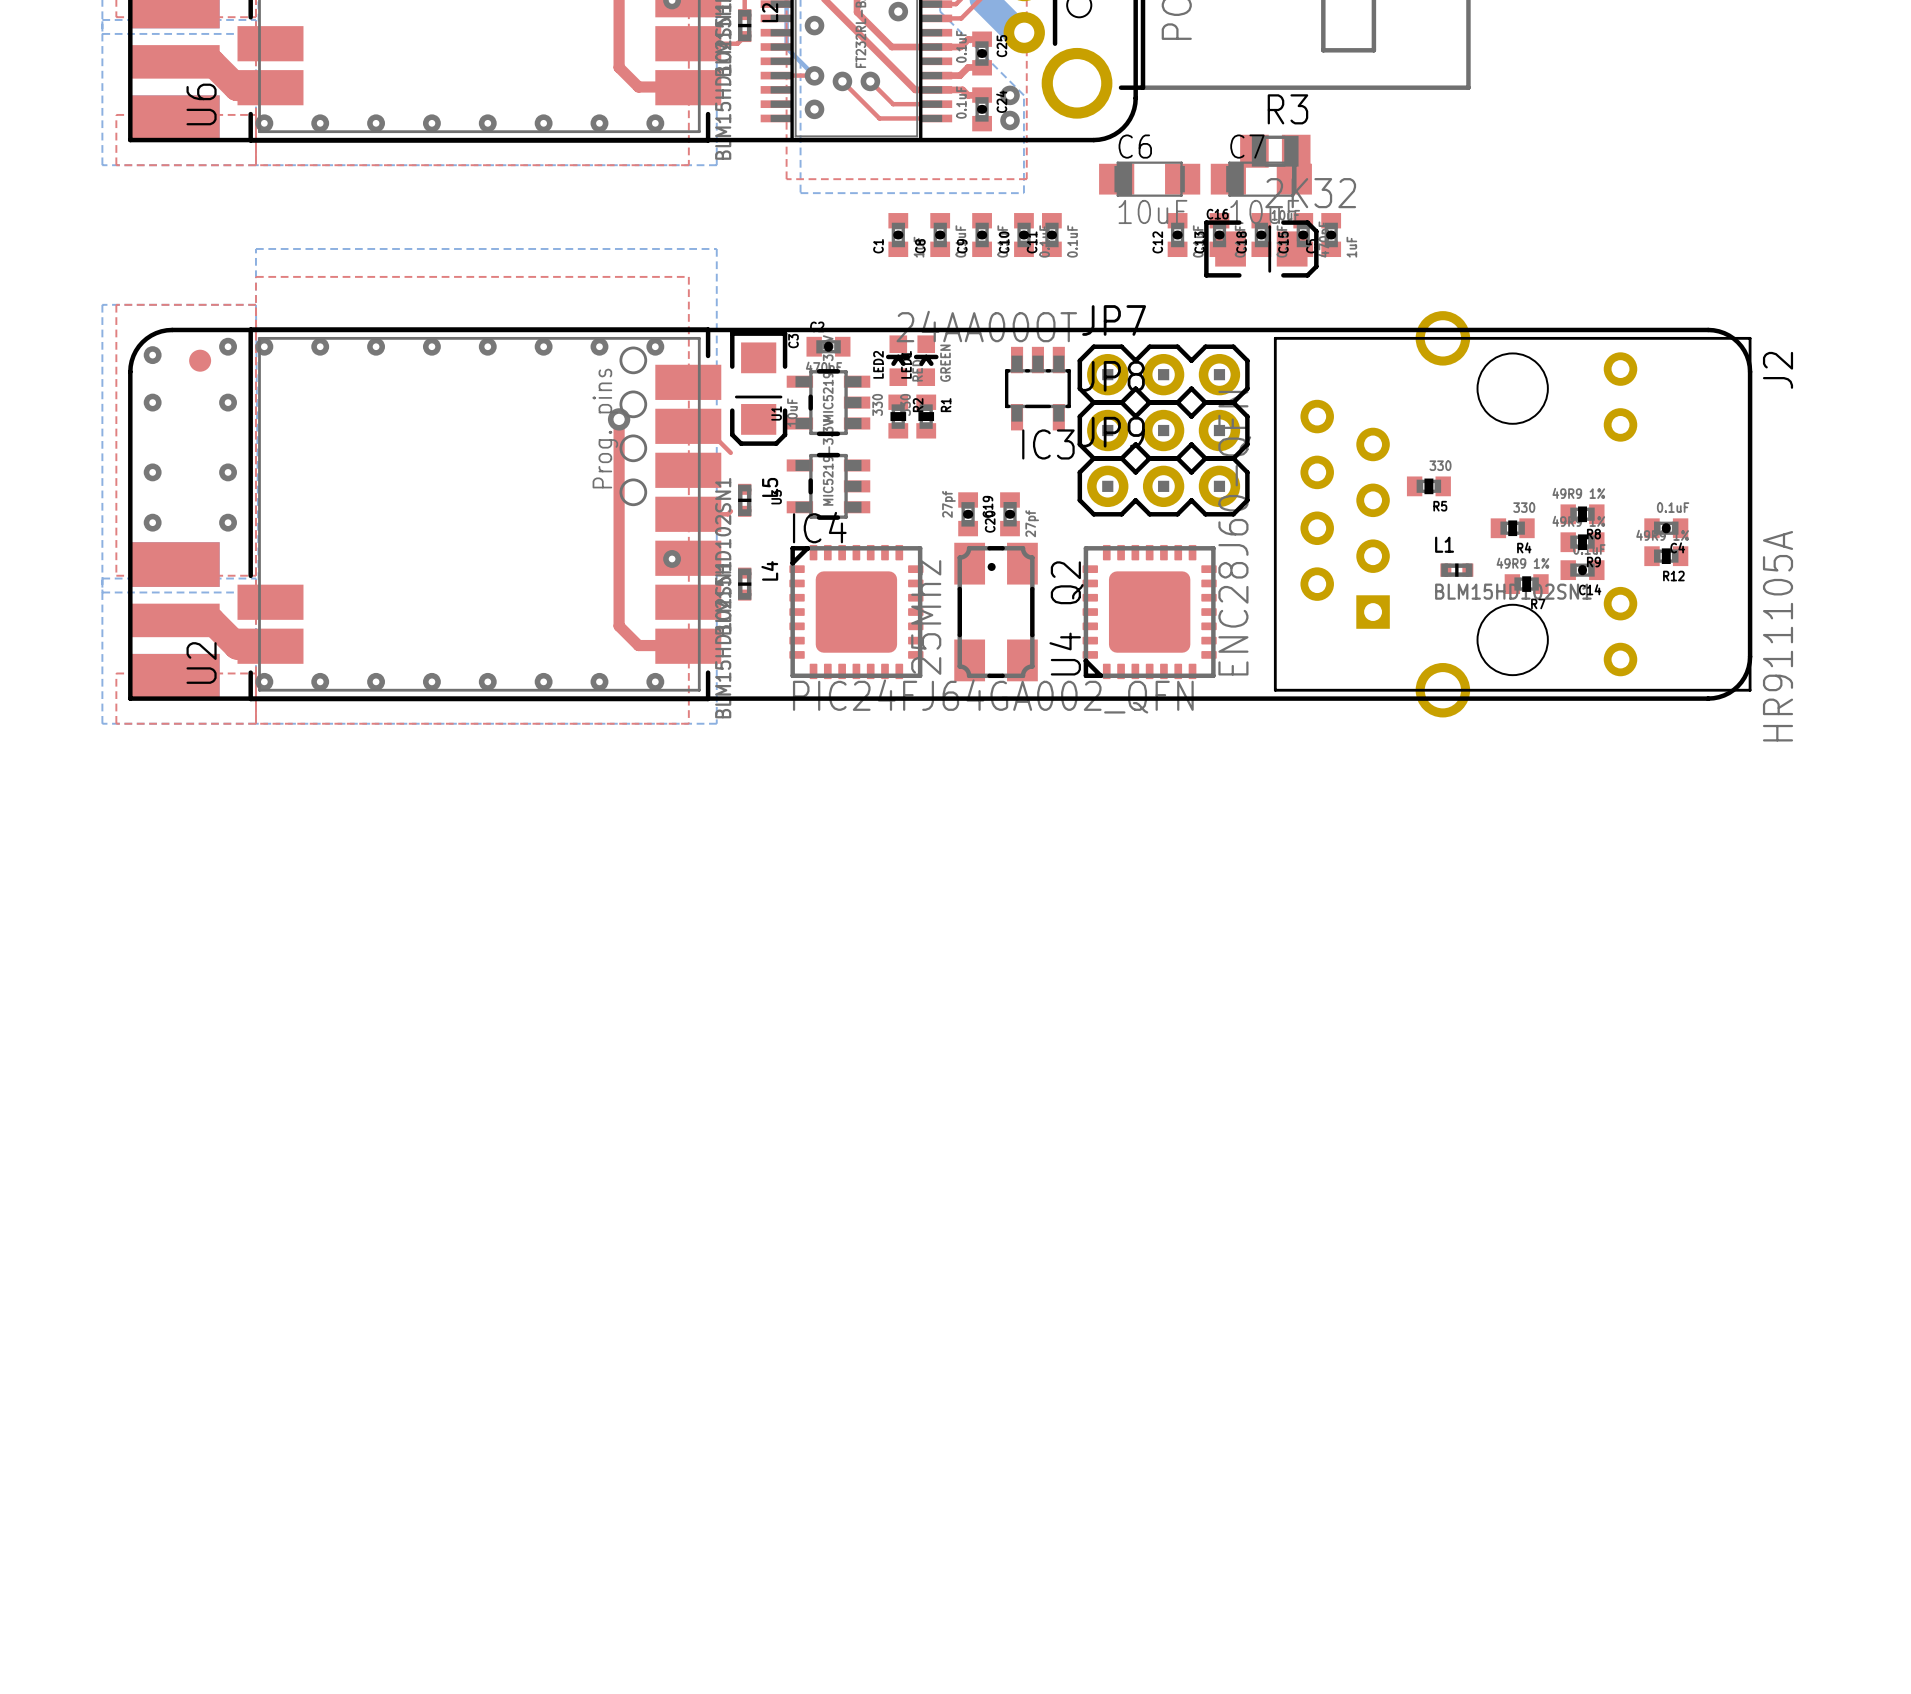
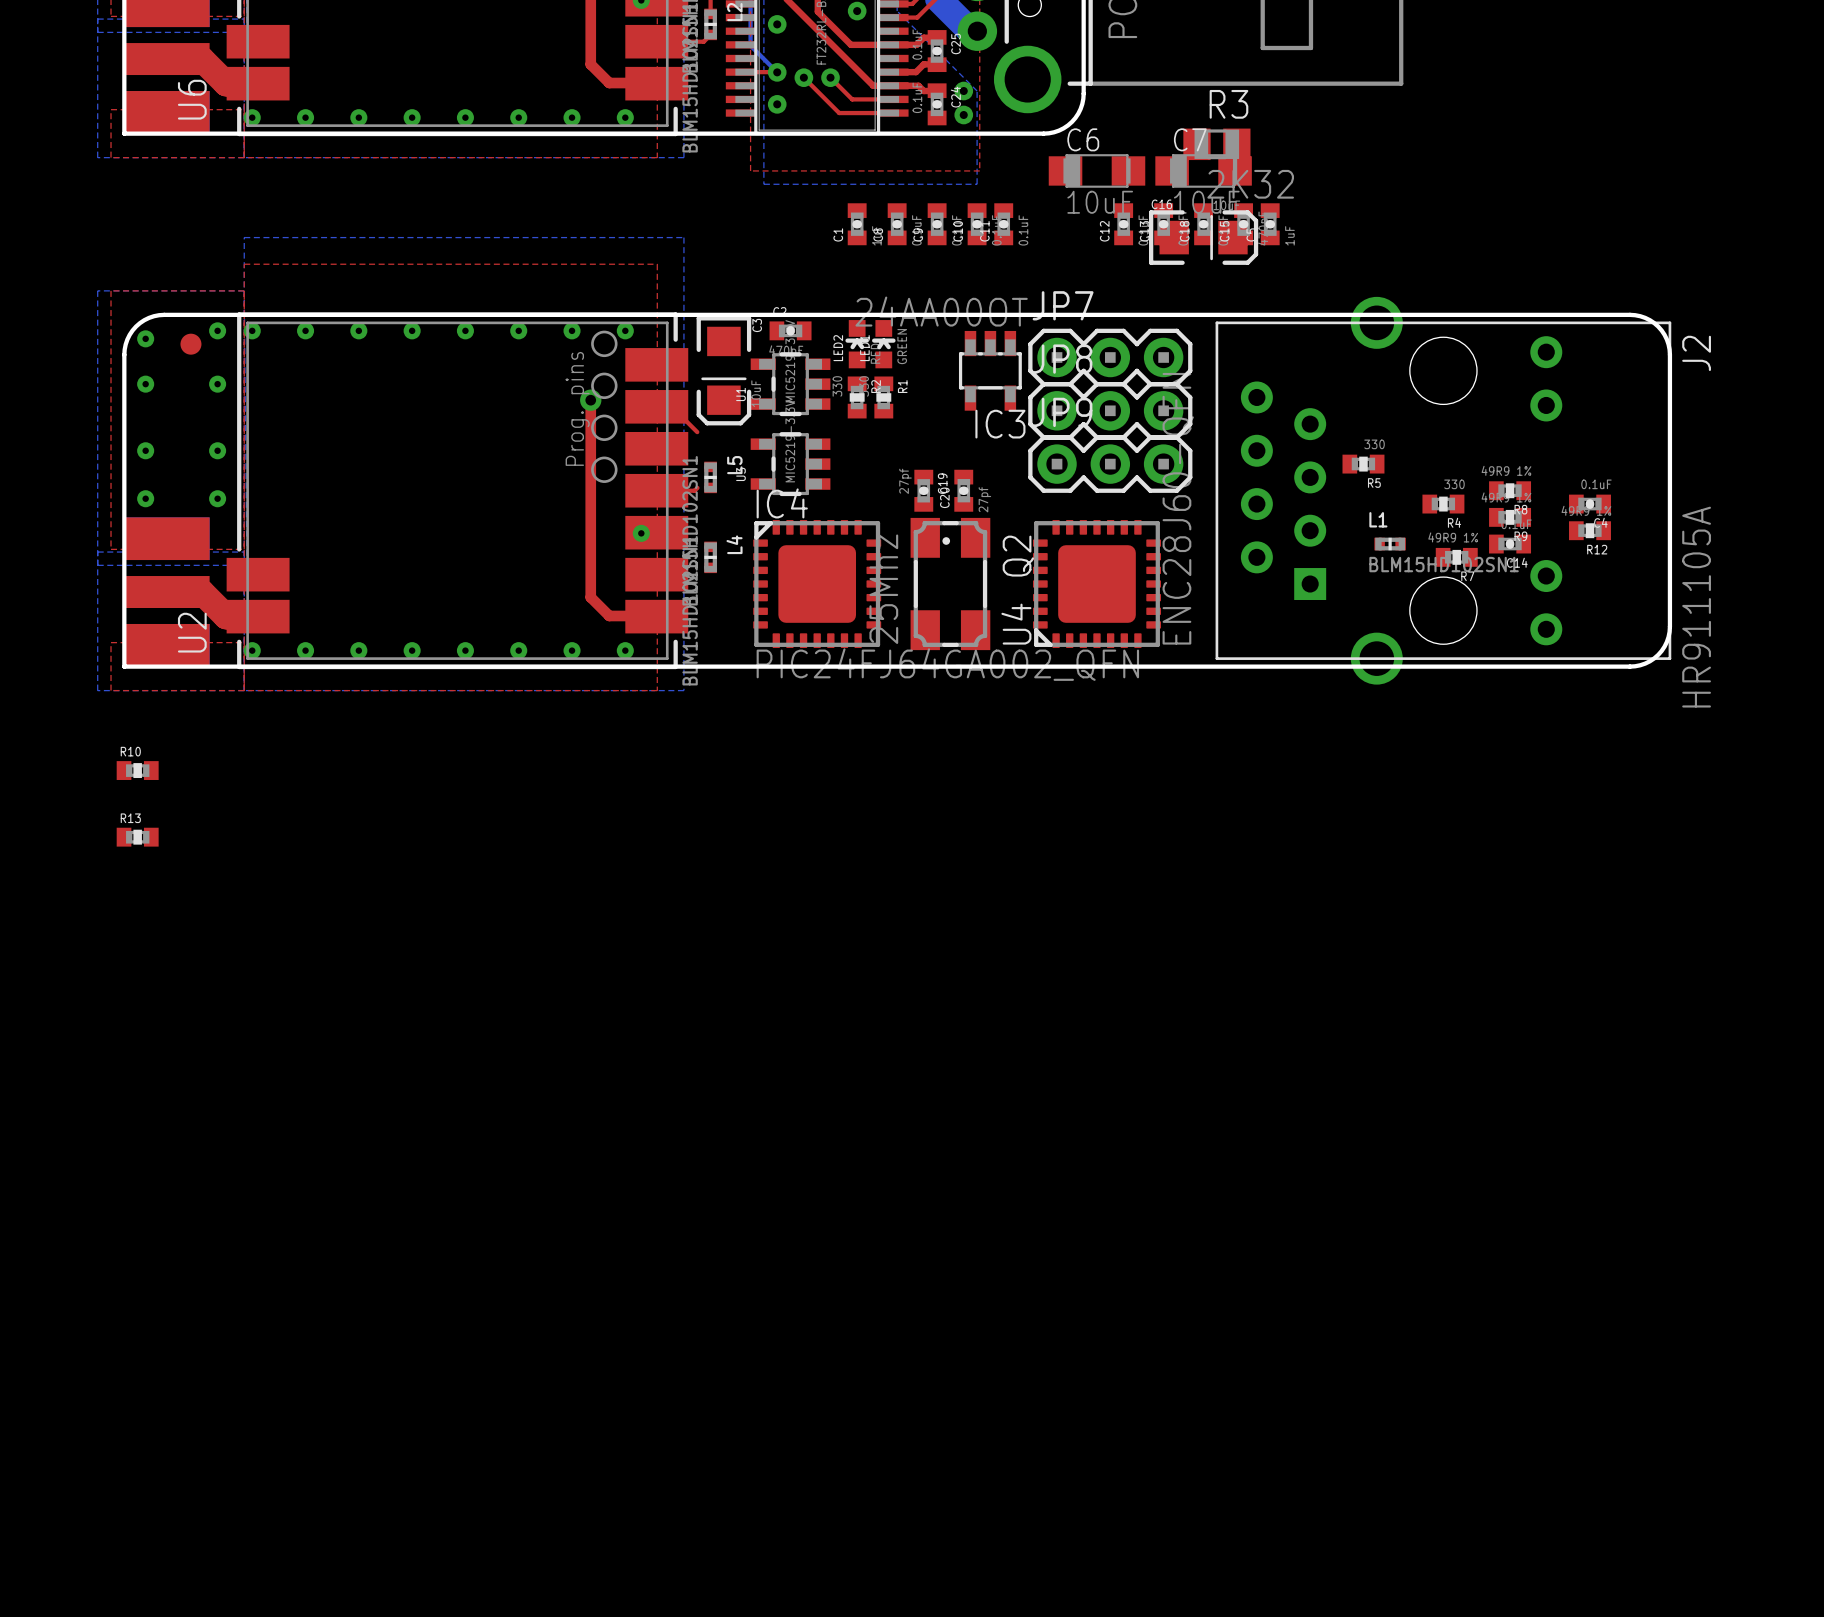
R10: none -> (137, 770)
R13: none -> (137, 837)

